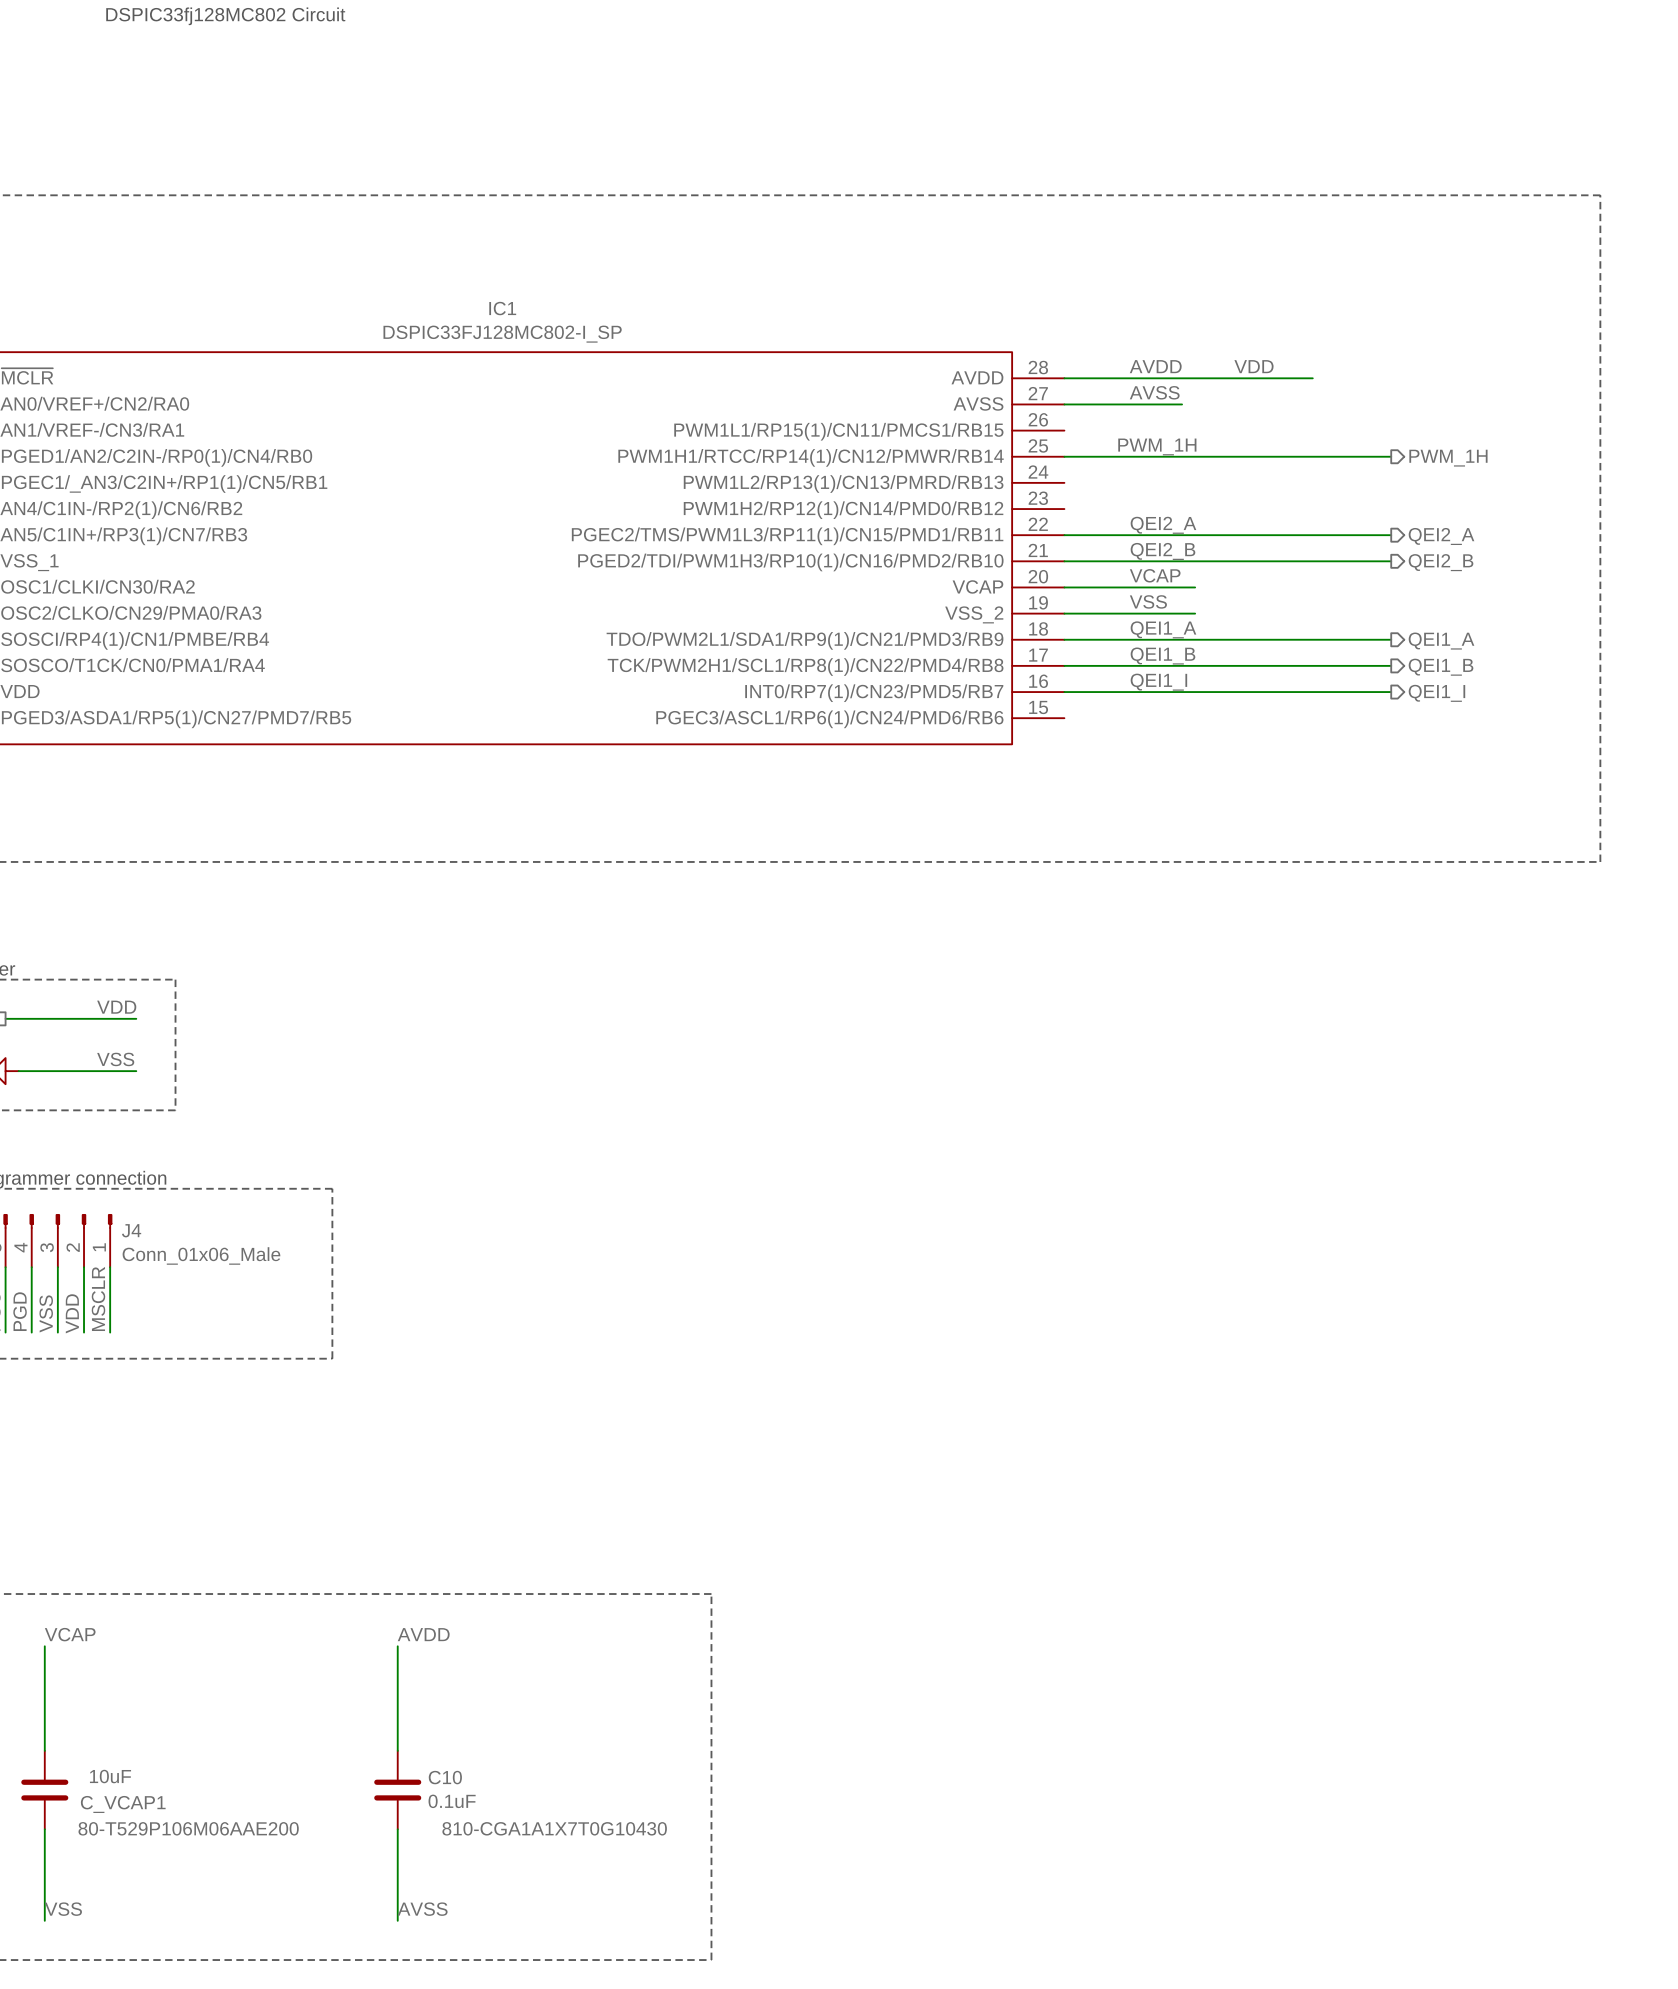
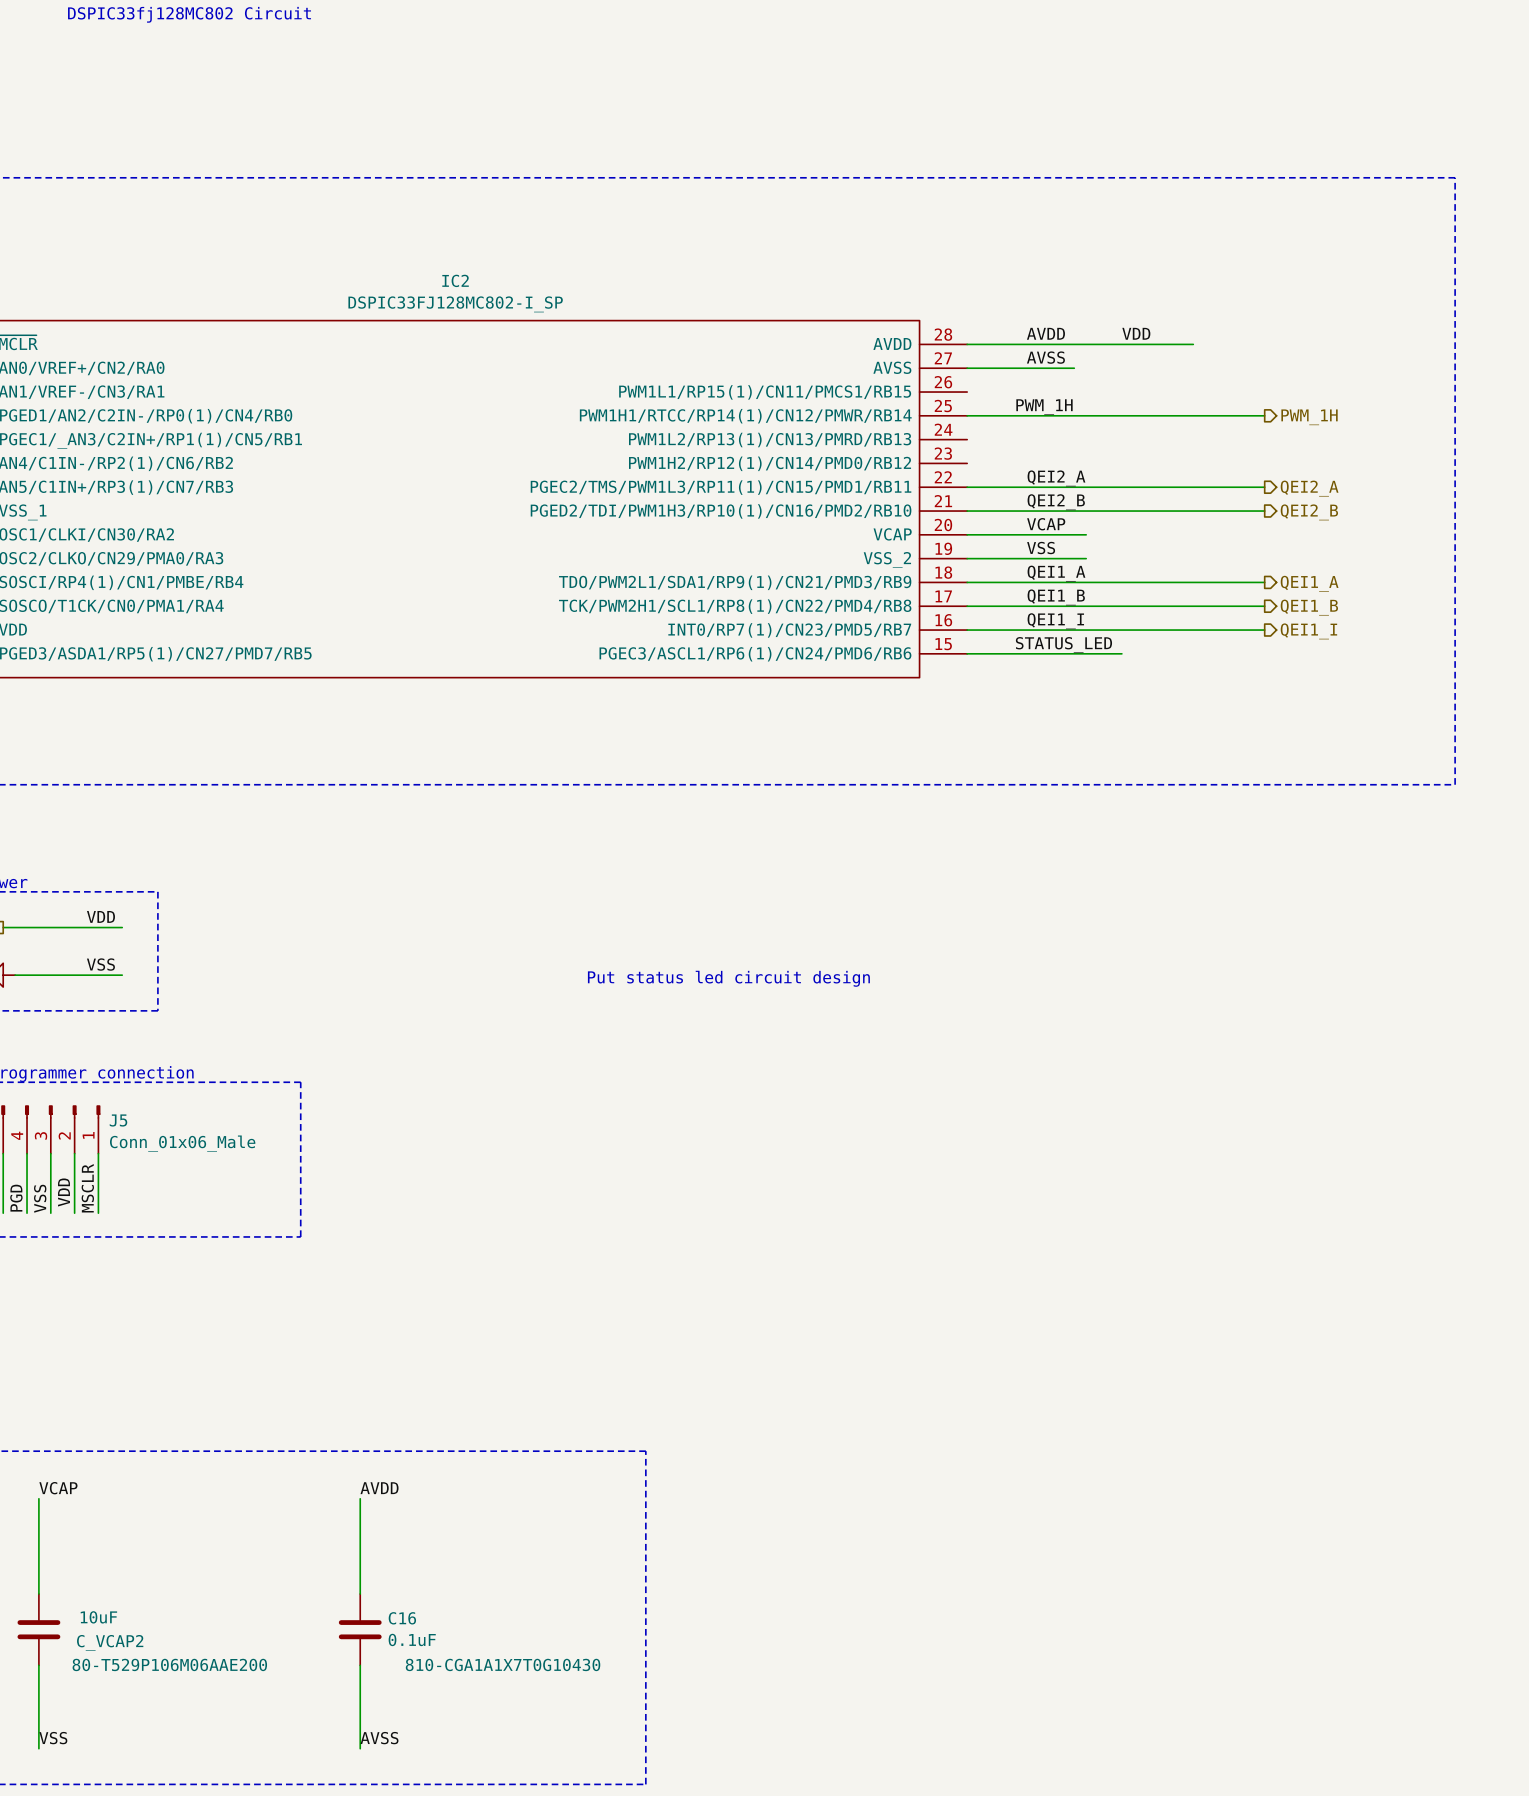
IC1 name: IC1 (502, 308) -> IC2 (455, 280)
label: none -> STATUS_LED (1063, 645)
wire: none -> (967, 653) (1121, 653)
text: none -> Put status led circuit design (728, 978)
J4 name: J4 (131, 1230) -> J5 (118, 1120)
C10 name: C10 (445, 1777) -> C16 (402, 1618)
C_VCAP1 name: C_VCAP1 (123, 1804) -> C_VCAP2 (110, 1642)

